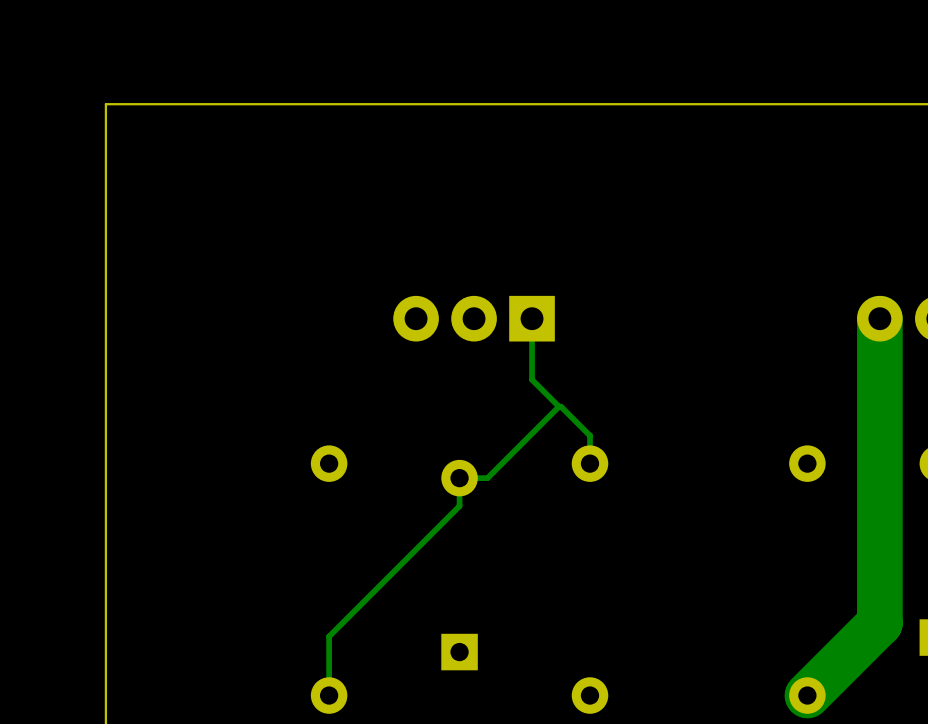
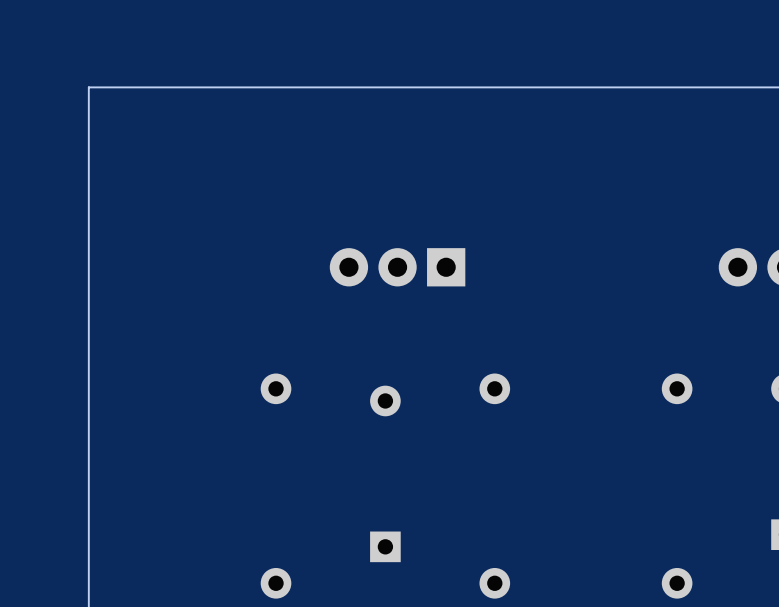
track: (532, 318) (532, 379) (558, 406) -> none
track: (879, 318) (879, 623) (807, 695) -> none
track: (558, 406) (487, 478) (459, 478) (459, 506) (329, 636) (329, 695) -> none
track: (558, 406) (590, 435) (590, 463) -> none

